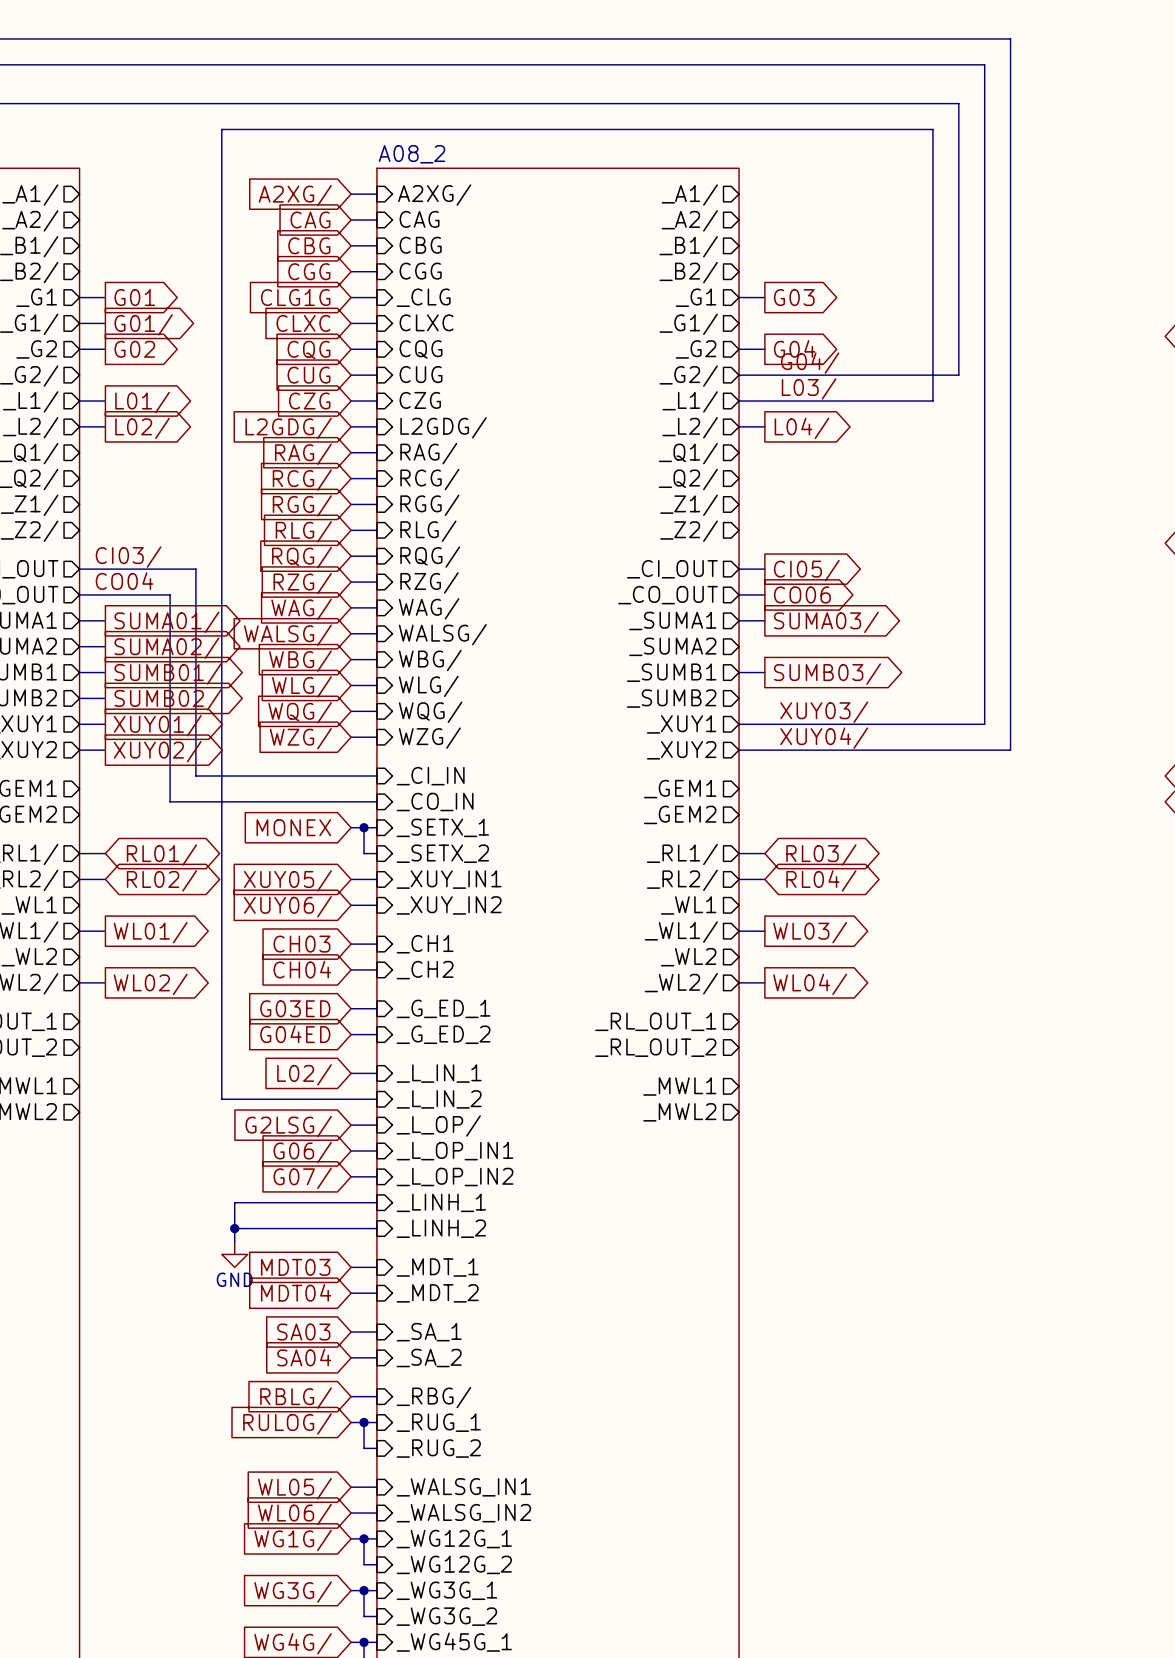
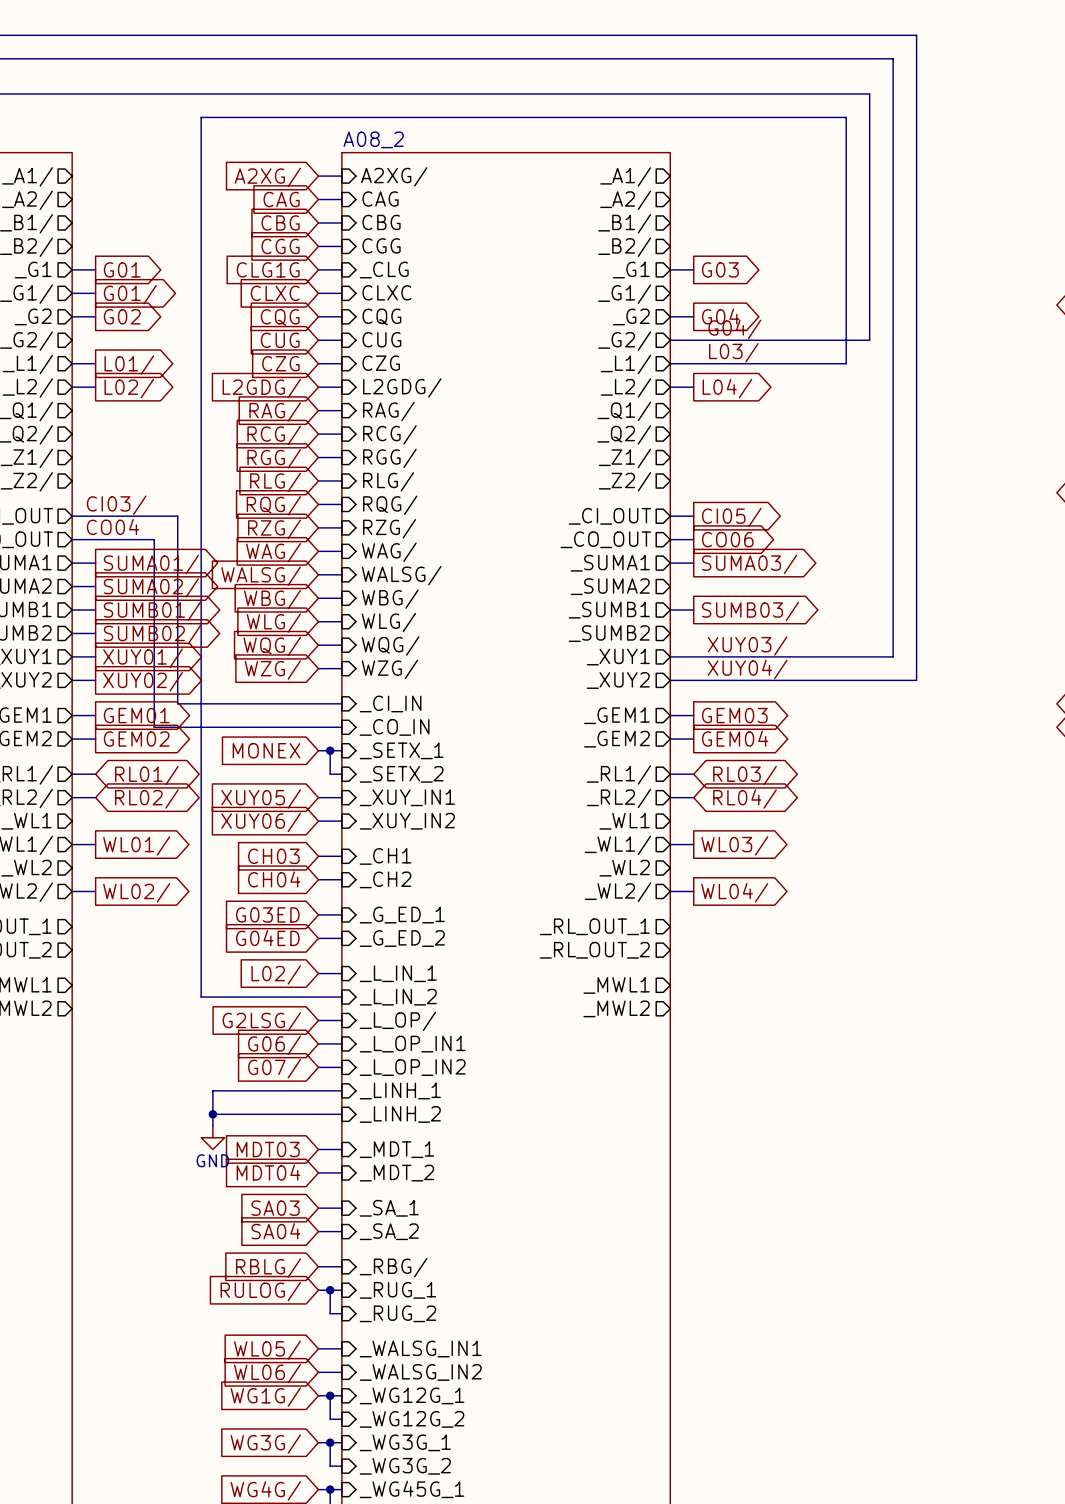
wire: none -> (72, 715) (95, 715)
global label: none -> GEM01 (136, 715)
wire: none -> (670, 715) (693, 715)
global label: none -> GEM03 (734, 715)
wire: none -> (72, 739) (95, 739)
global label: none -> GEM02 (136, 739)
wire: none -> (670, 739) (693, 739)
global label: none -> GEM04 (735, 738)

